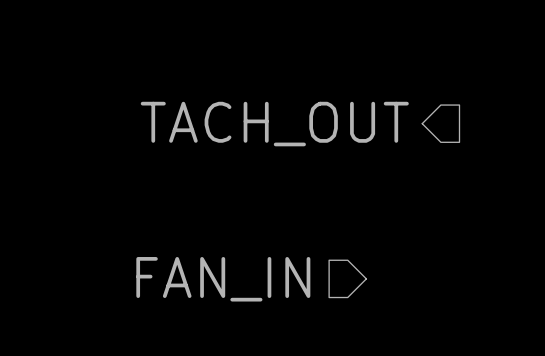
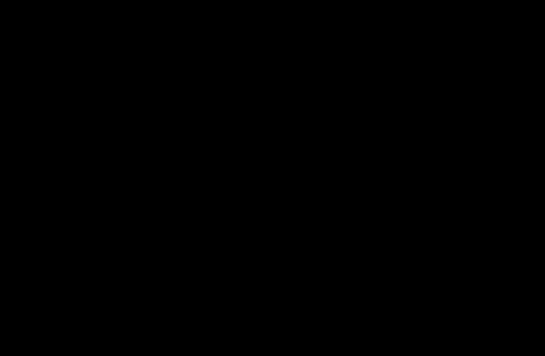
hierarchical label: TACH_OUT (274, 124) -> none
hierarchical label: FAN_IN (223, 279) -> none

